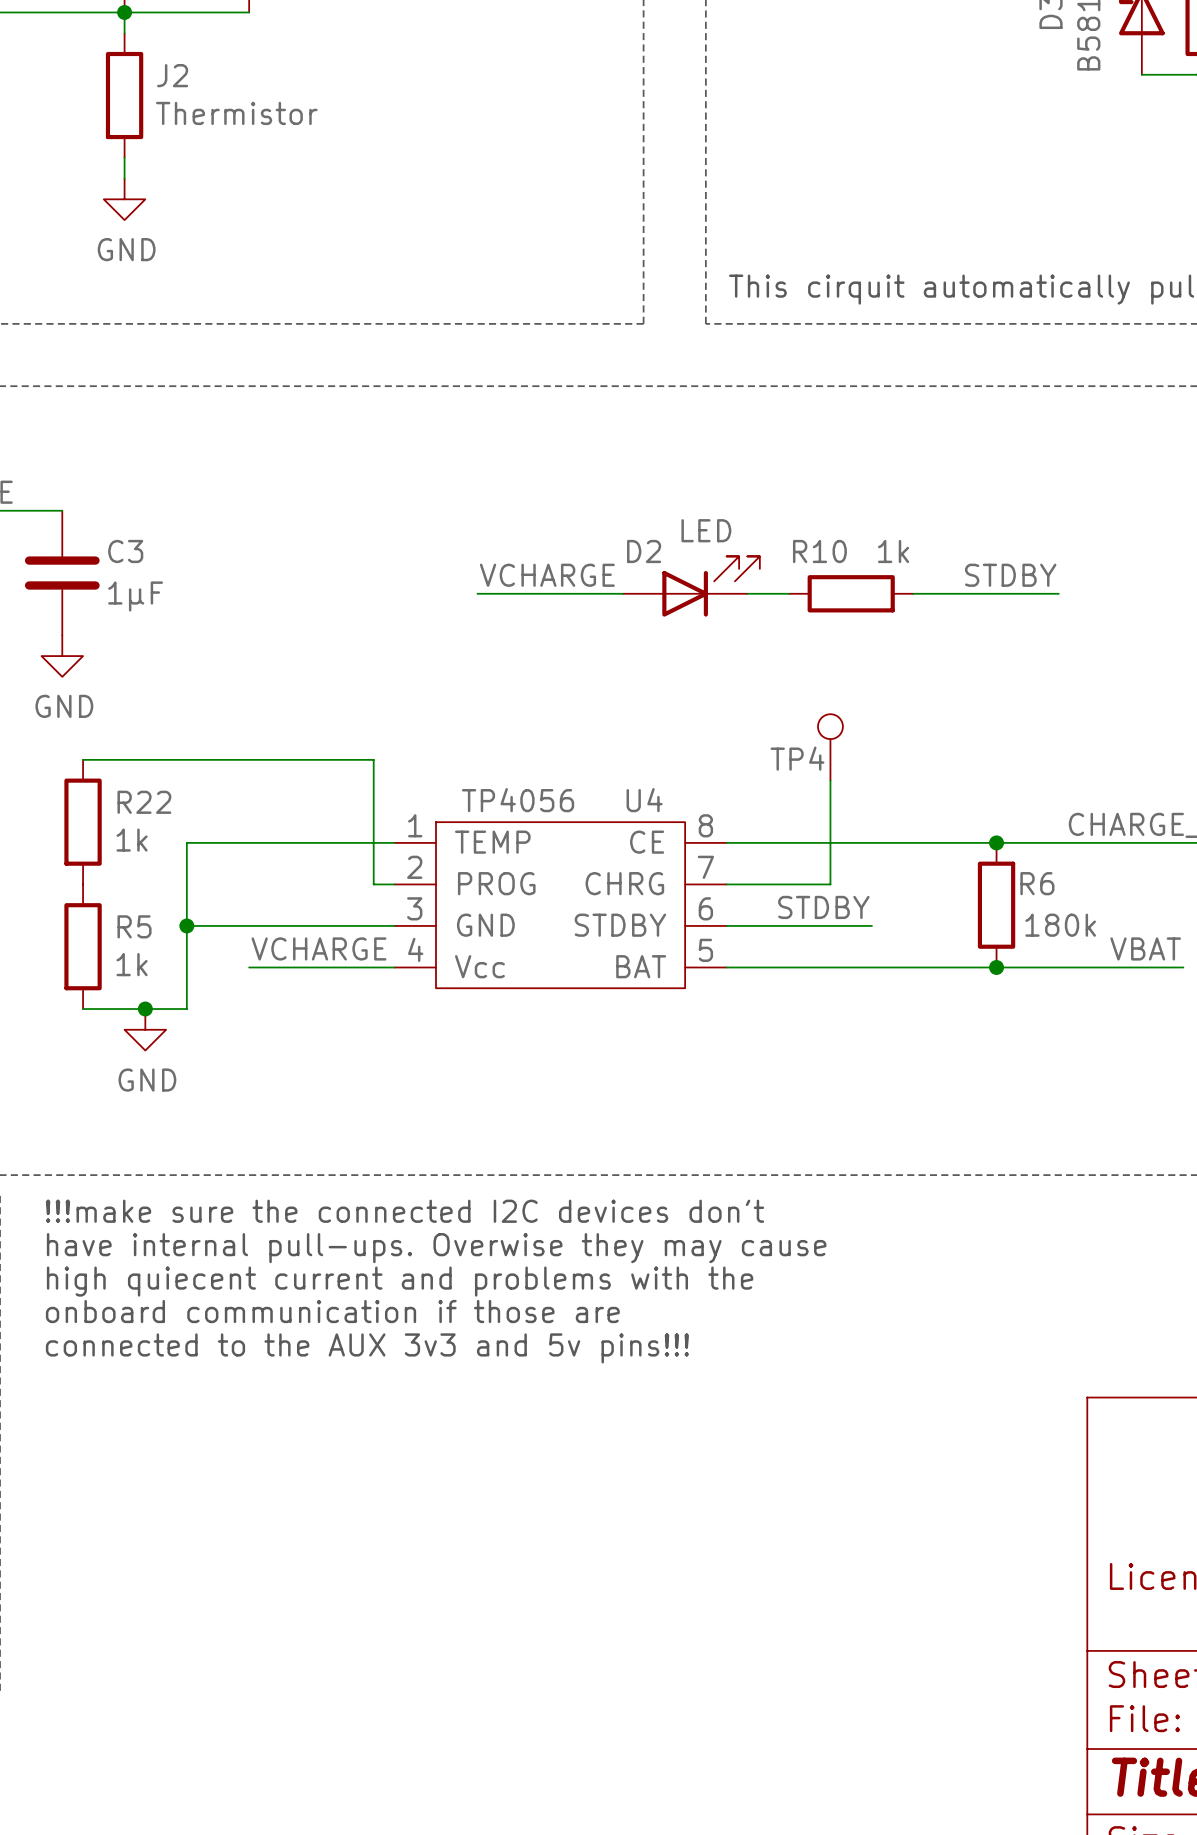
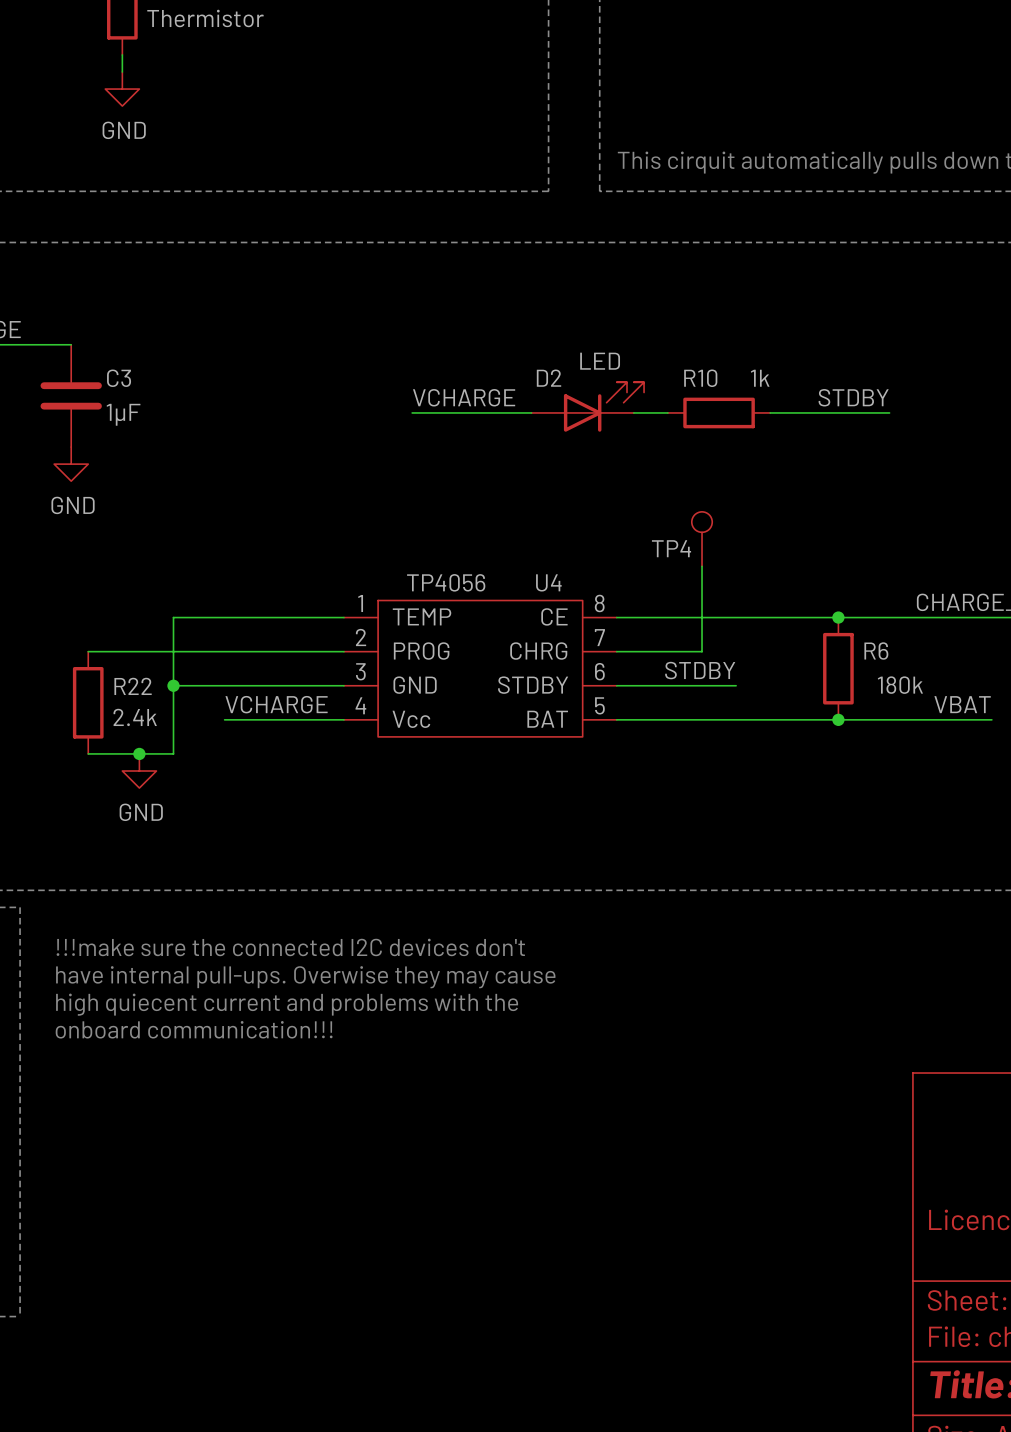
wire: (83, 759) (373, 759) (373, 884) -> (88, 651) (326, 651)
R22: 1k (83, 822) -> none
R5 name: R5 (134, 926) -> R22 (133, 686)
R5 value: 1k (132, 964) -> 2.4k (135, 717)
text: !!!make sure the connected I2C devices don't (405, 1211) -> none
text: have internal pull-ups. Overwise they may cause (436, 1248) -> !!!make sure the connected I2C devices don't (290, 947)
text: high quiecent current and problems with the (400, 1281) -> have internal pull-ups. Overwise they may cause (305, 977)
text: onboard communication if those are (332, 1311) -> high quiecent current and problems with the (287, 1004)
text: connected to the AUX 3v3 and 5v pins!!! (367, 1348) -> onboard communication!!! (194, 1029)

